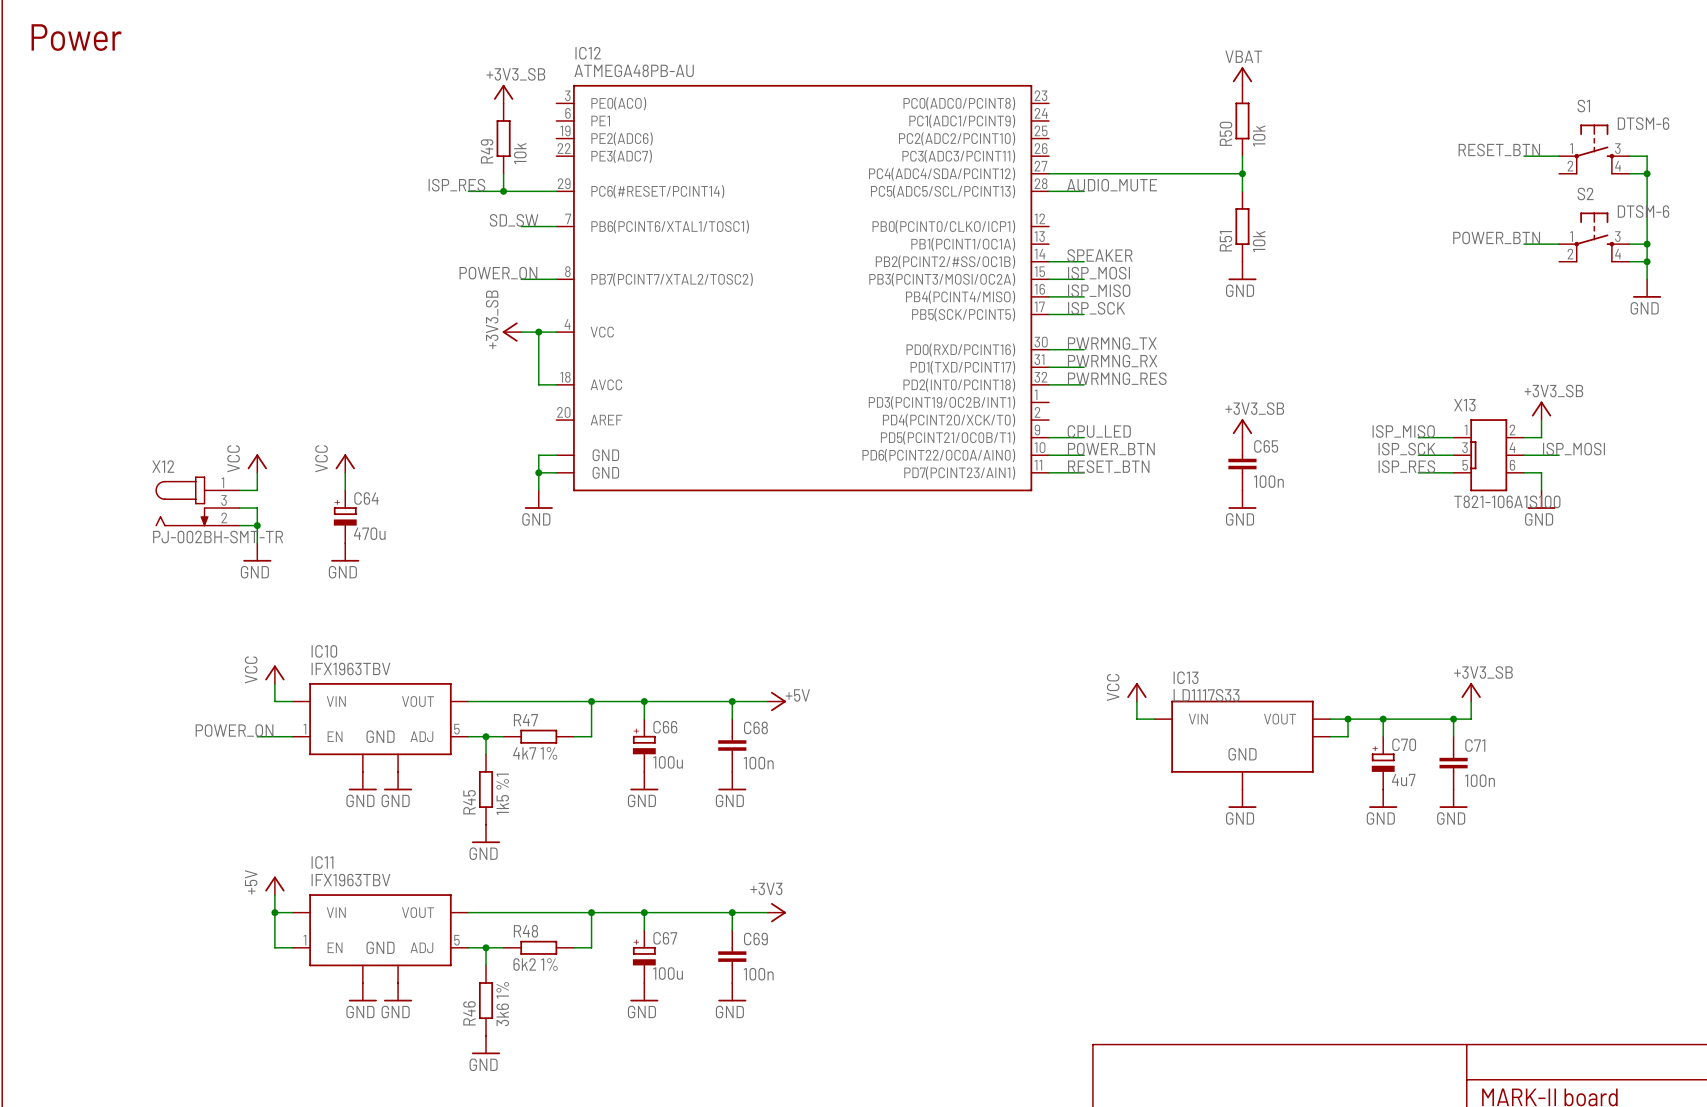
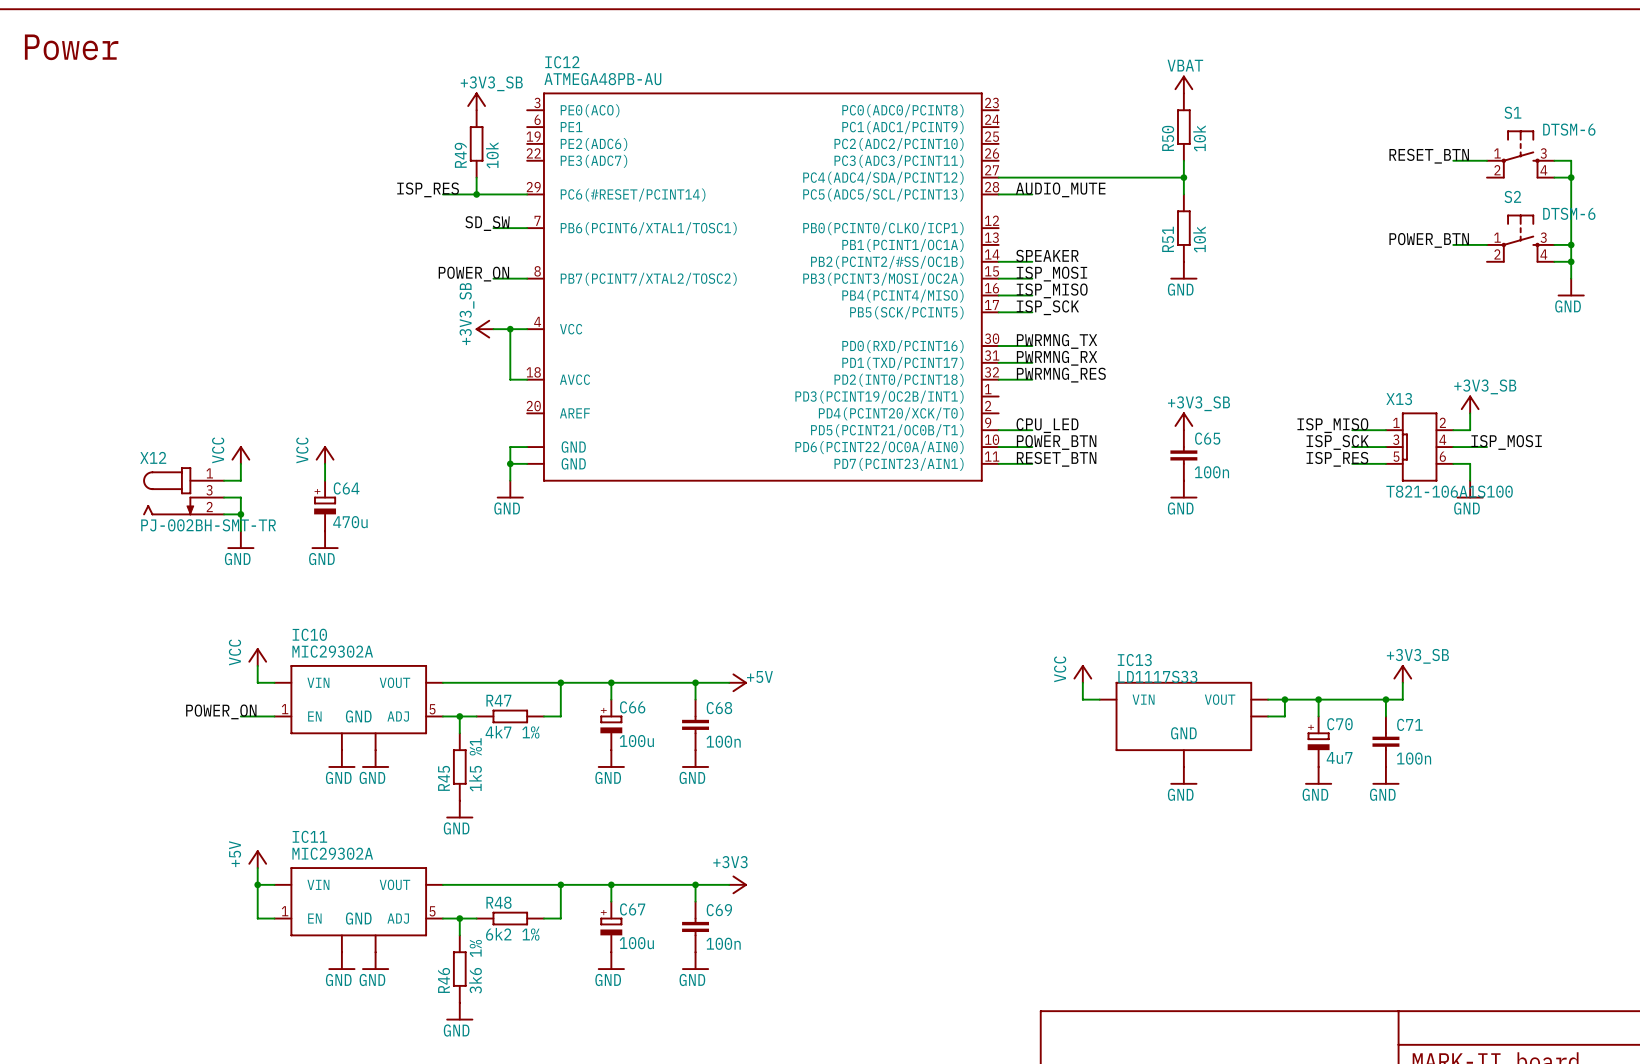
IC10 value: IFX1963TBV (350, 668) -> MIC29302A (332, 651)
IC11 value: IFX1963TBV (350, 880) -> MIC29302A (332, 853)

